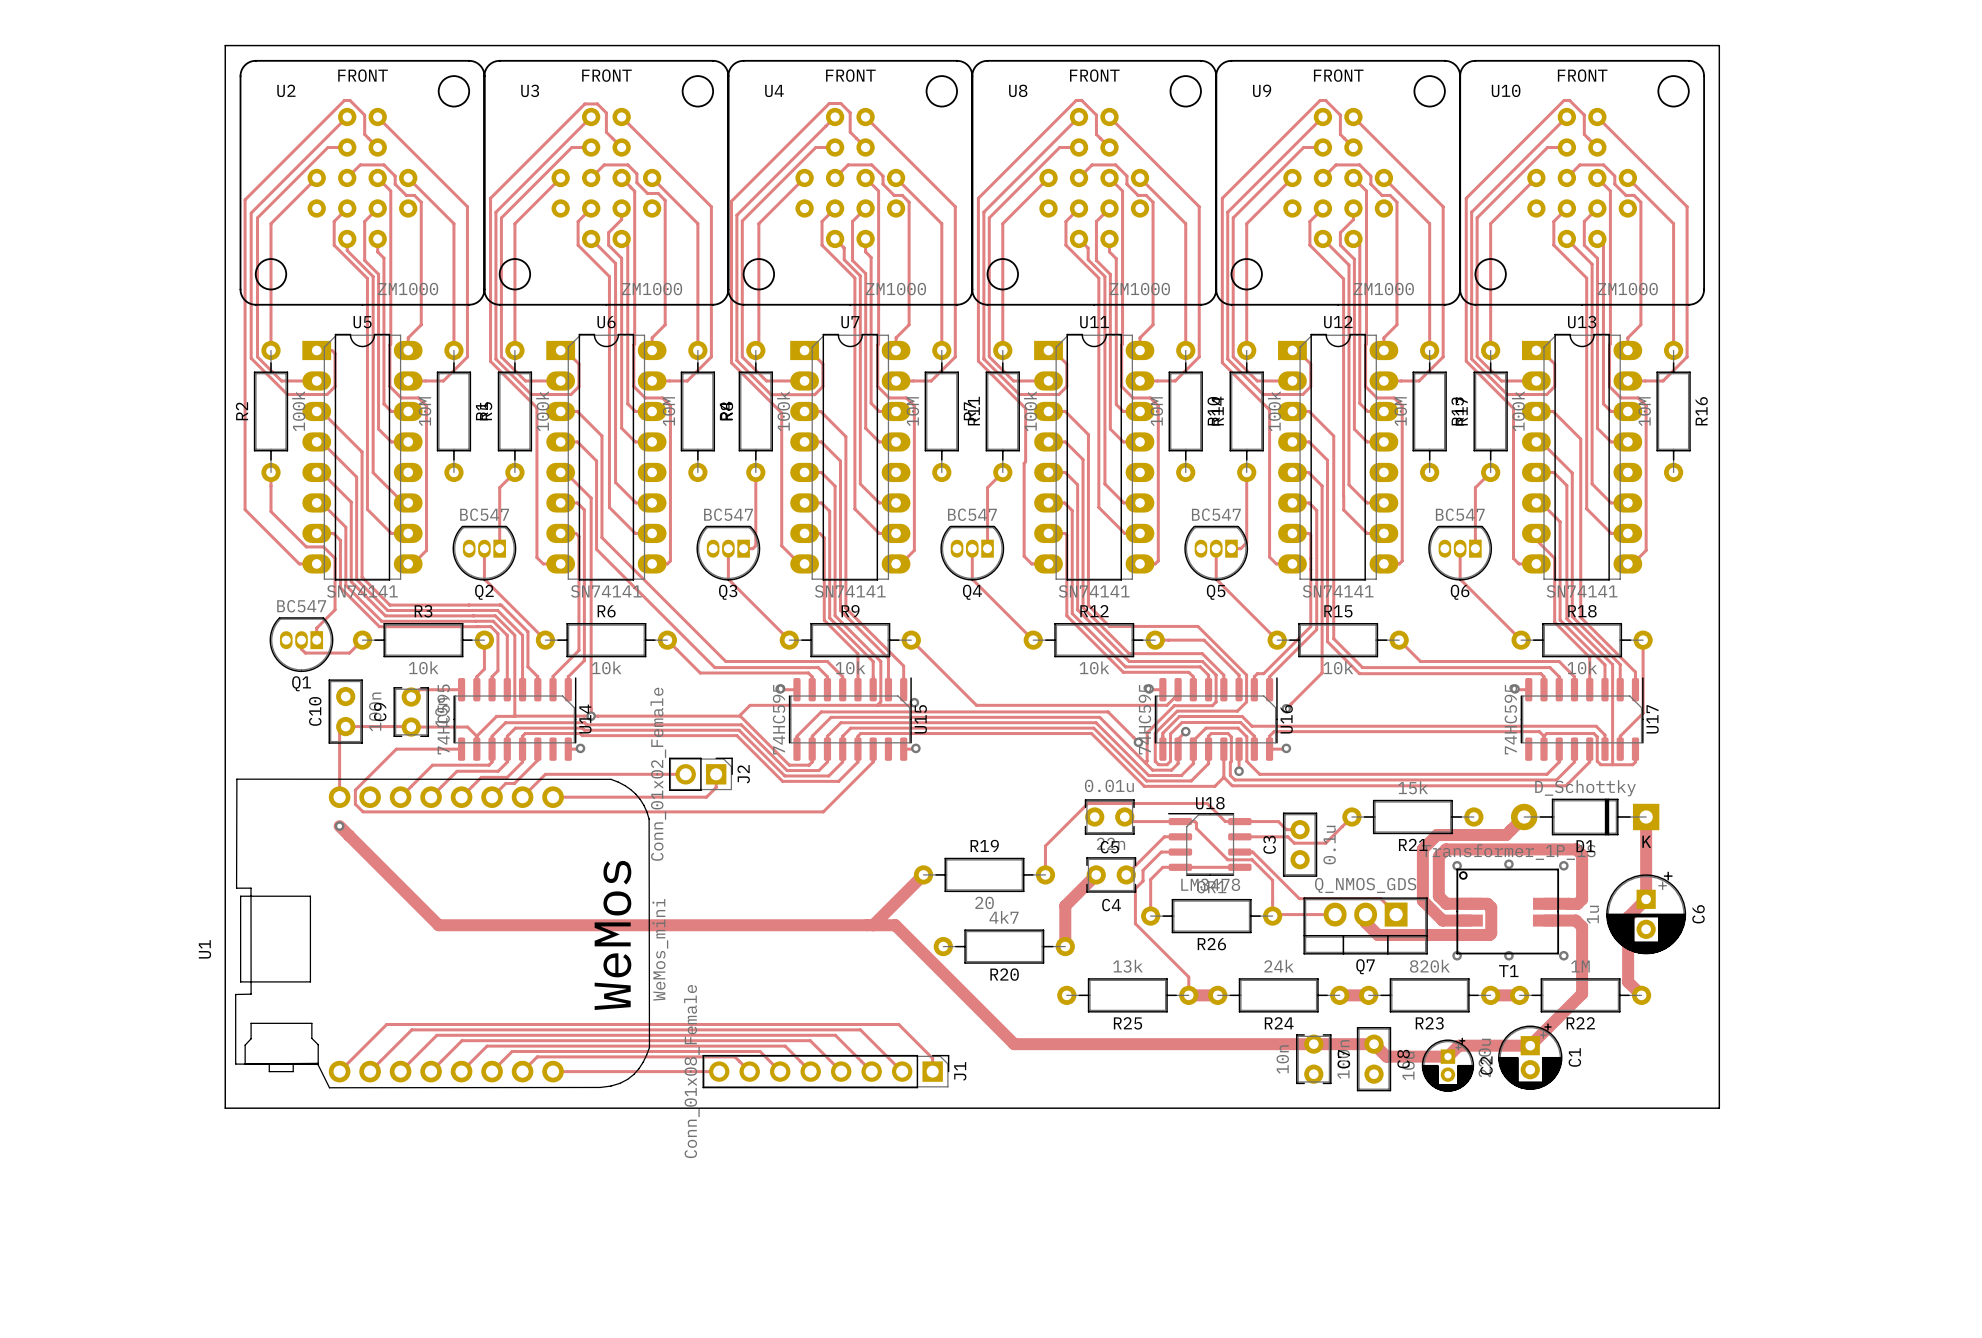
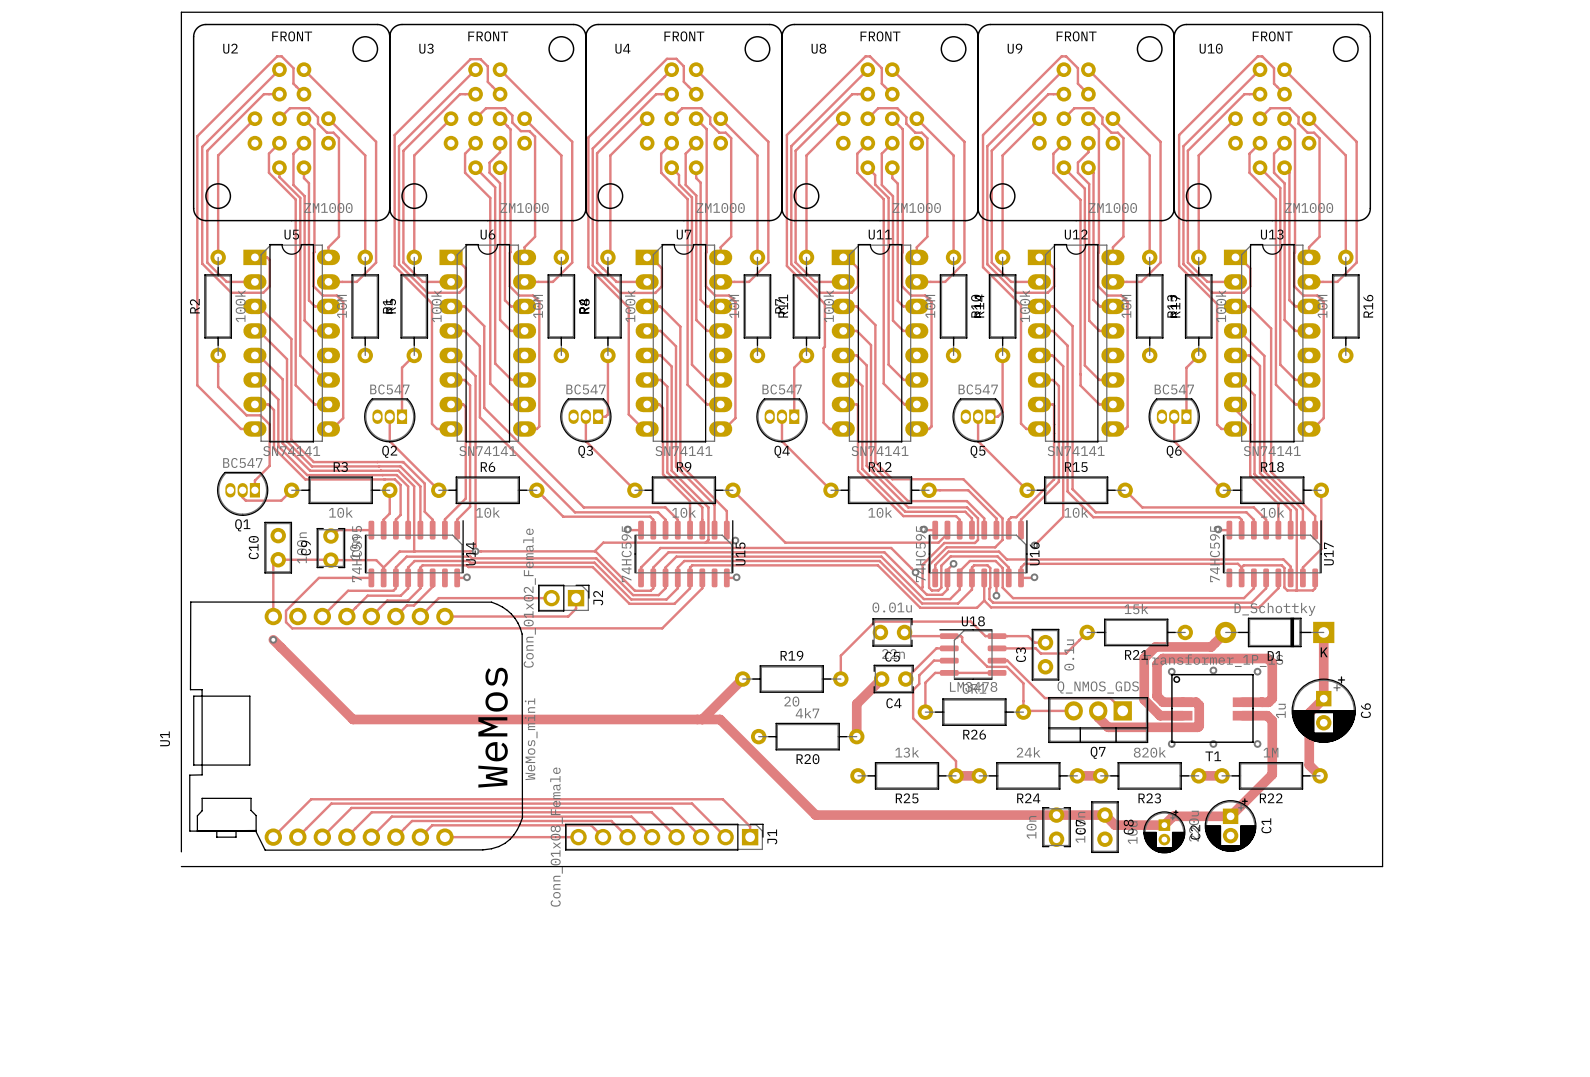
board edge: (225, 1089) (225, 1108) -> none

